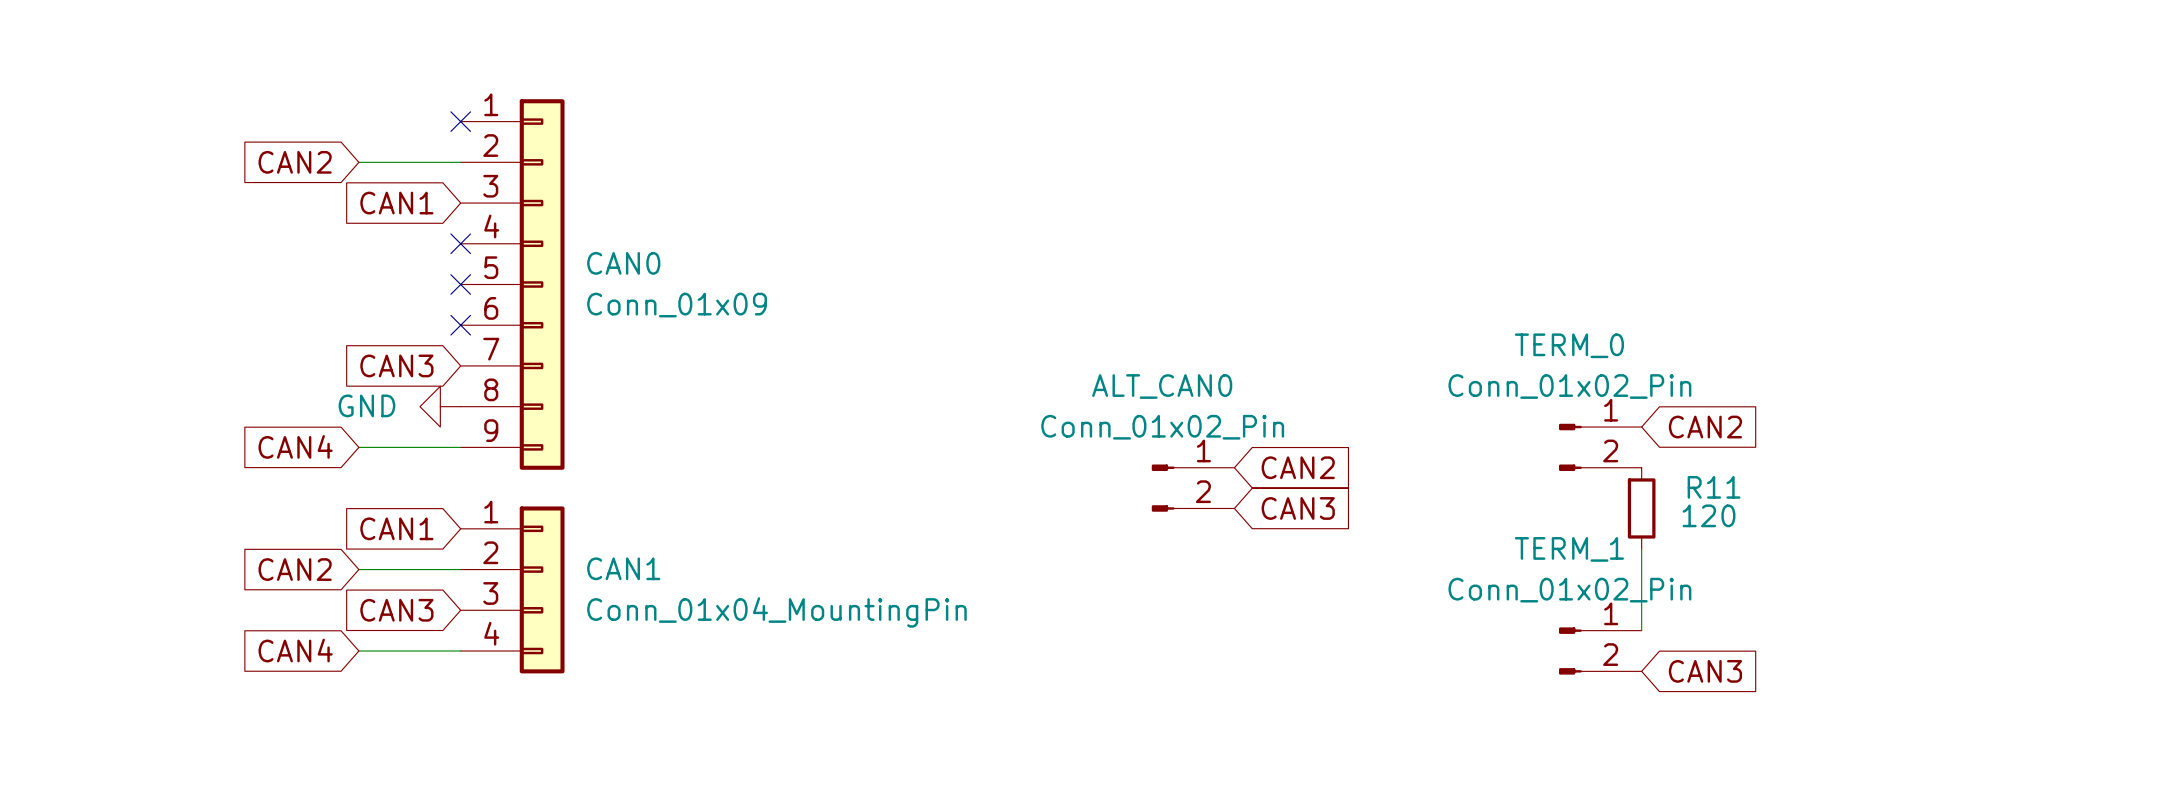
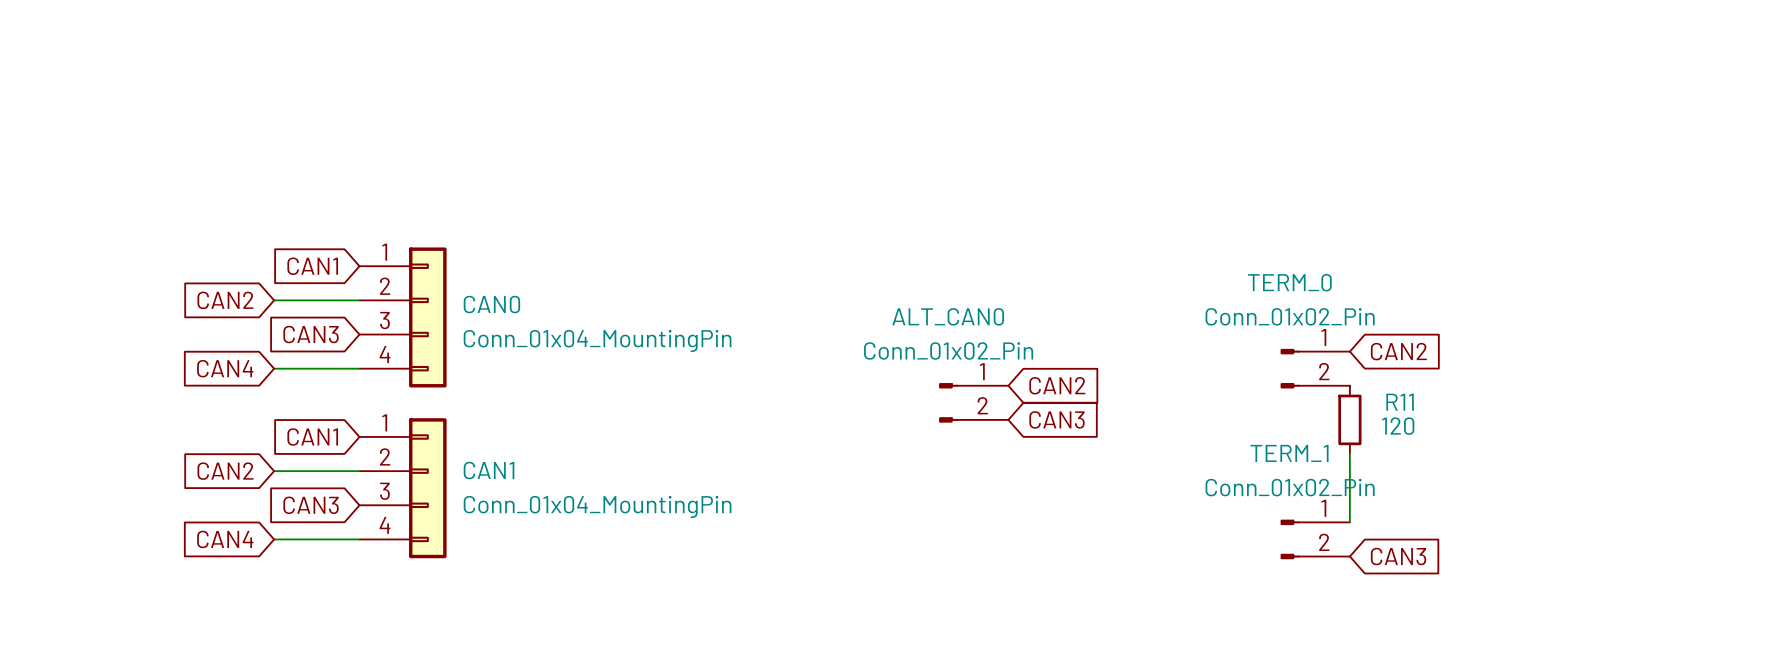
CAN0 symbol: [460, 99, 565, 470] -> [359, 247, 447, 388]
no-connect mark: (460, 121) -> none
global label position: CAN2 (295, 162) -> CAN2 (225, 300)
wire: (358, 162) (460, 162) -> (274, 300) (359, 300)
global label position: CAN1 (396, 203) -> CAN1 (312, 266)
no-connect mark: (460, 243) -> none
no-connect mark: (460, 284) -> none
CAN0 value: Conn_01x09 (677, 305) -> Conn_01x04_MountingPin (597, 340)
no-connect mark: (460, 325) -> none
global label position: CAN3 (396, 365) -> CAN3 (311, 334)
power symbol: GND (440, 406) -> none

